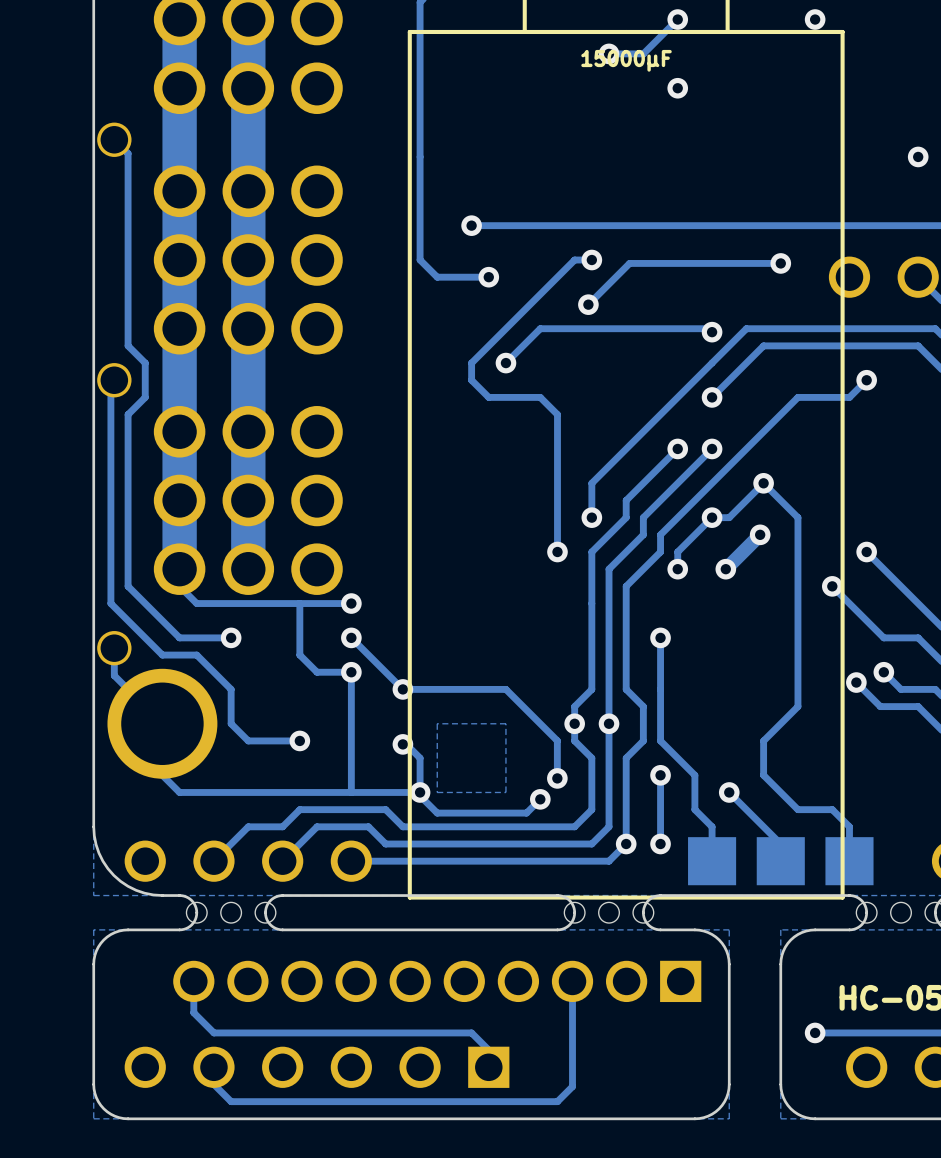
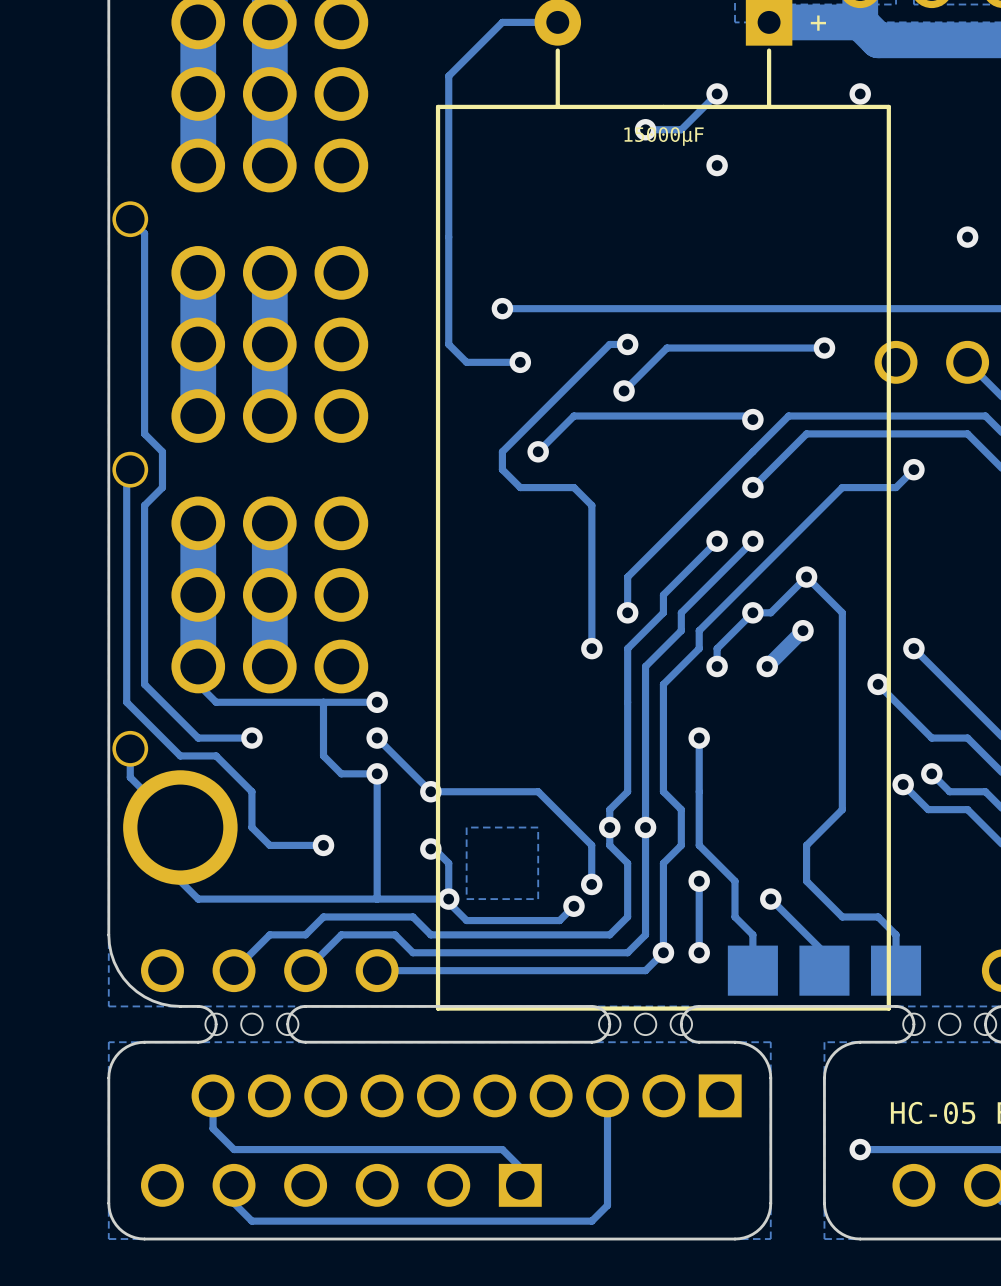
track: (179, 88) (179, 191) -> none
track: (248, 88) (248, 191) -> none
track: (179, 328) (179, 431) -> none
track: (248, 328) (248, 431) -> none

